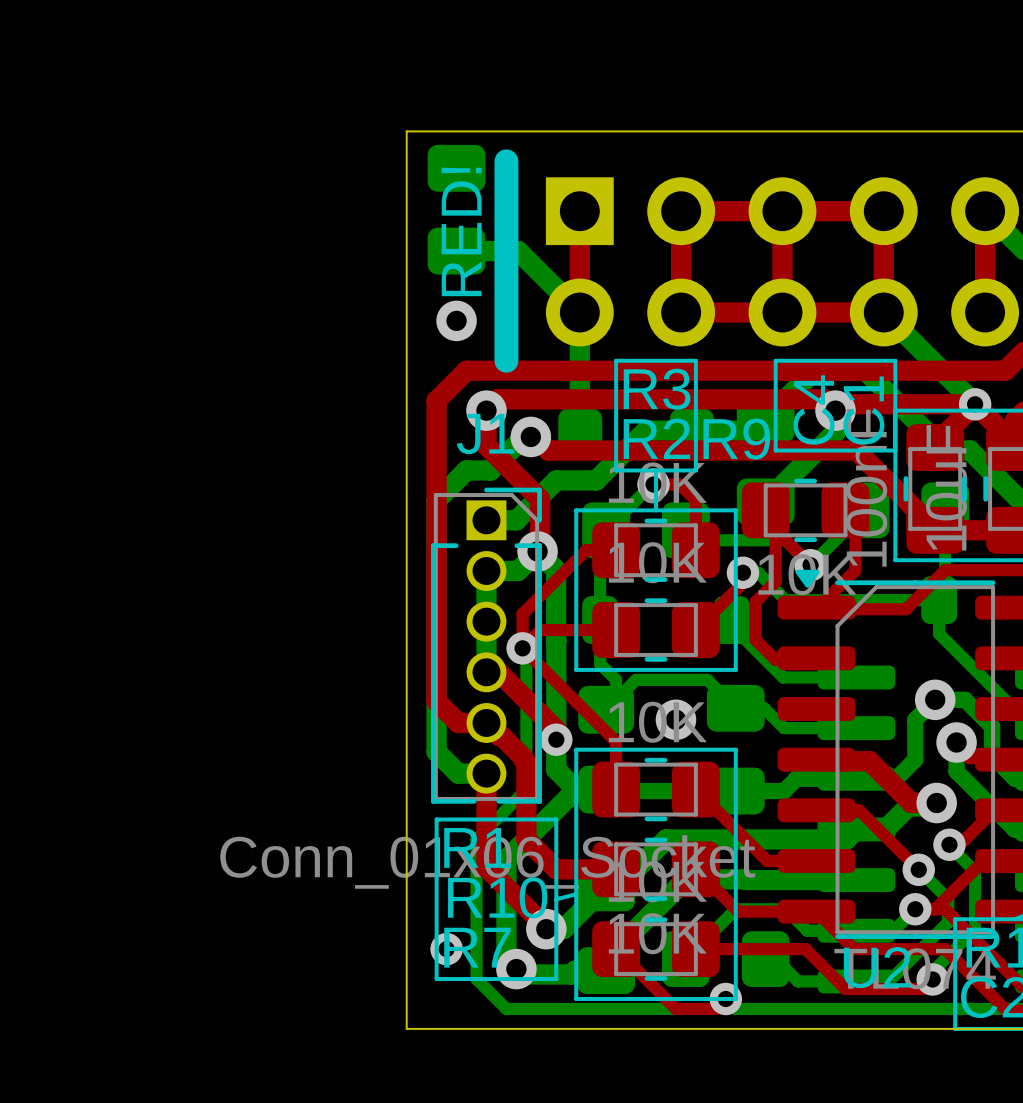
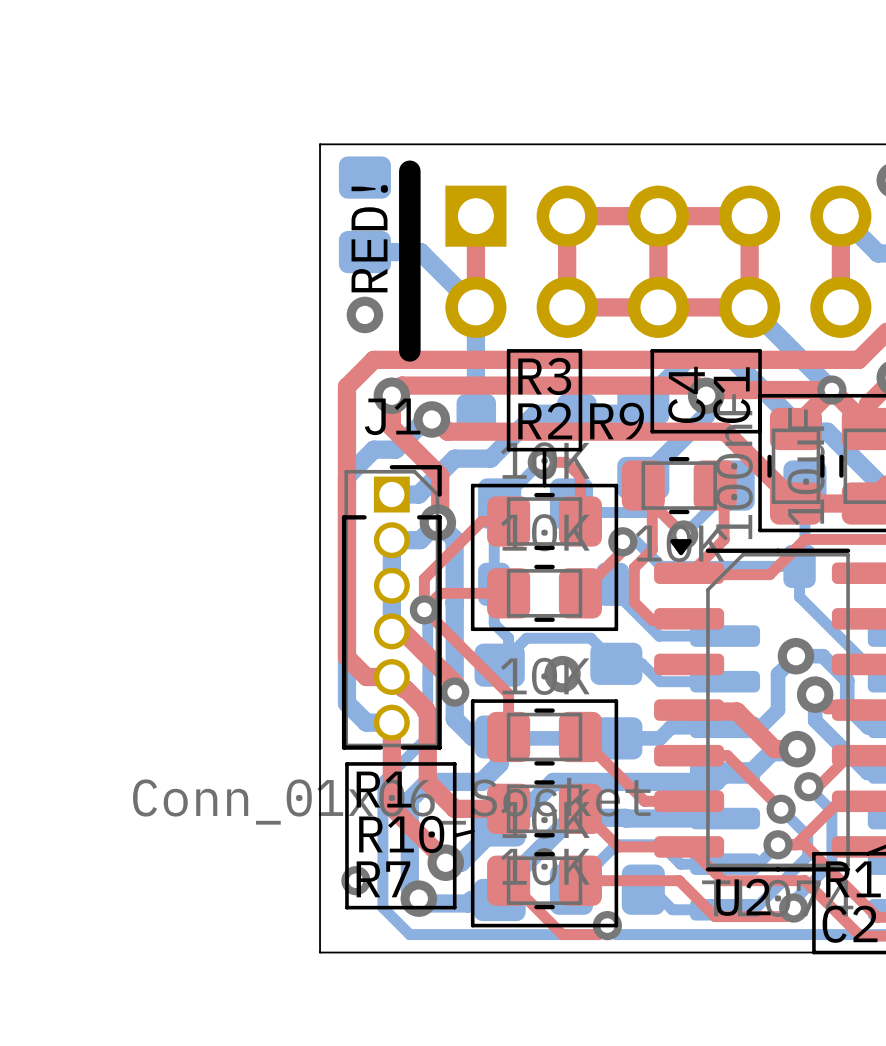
bottom track: (576, 789) (526, 839) -> (499, 737) (499, 763) (481, 781) (427, 781)

